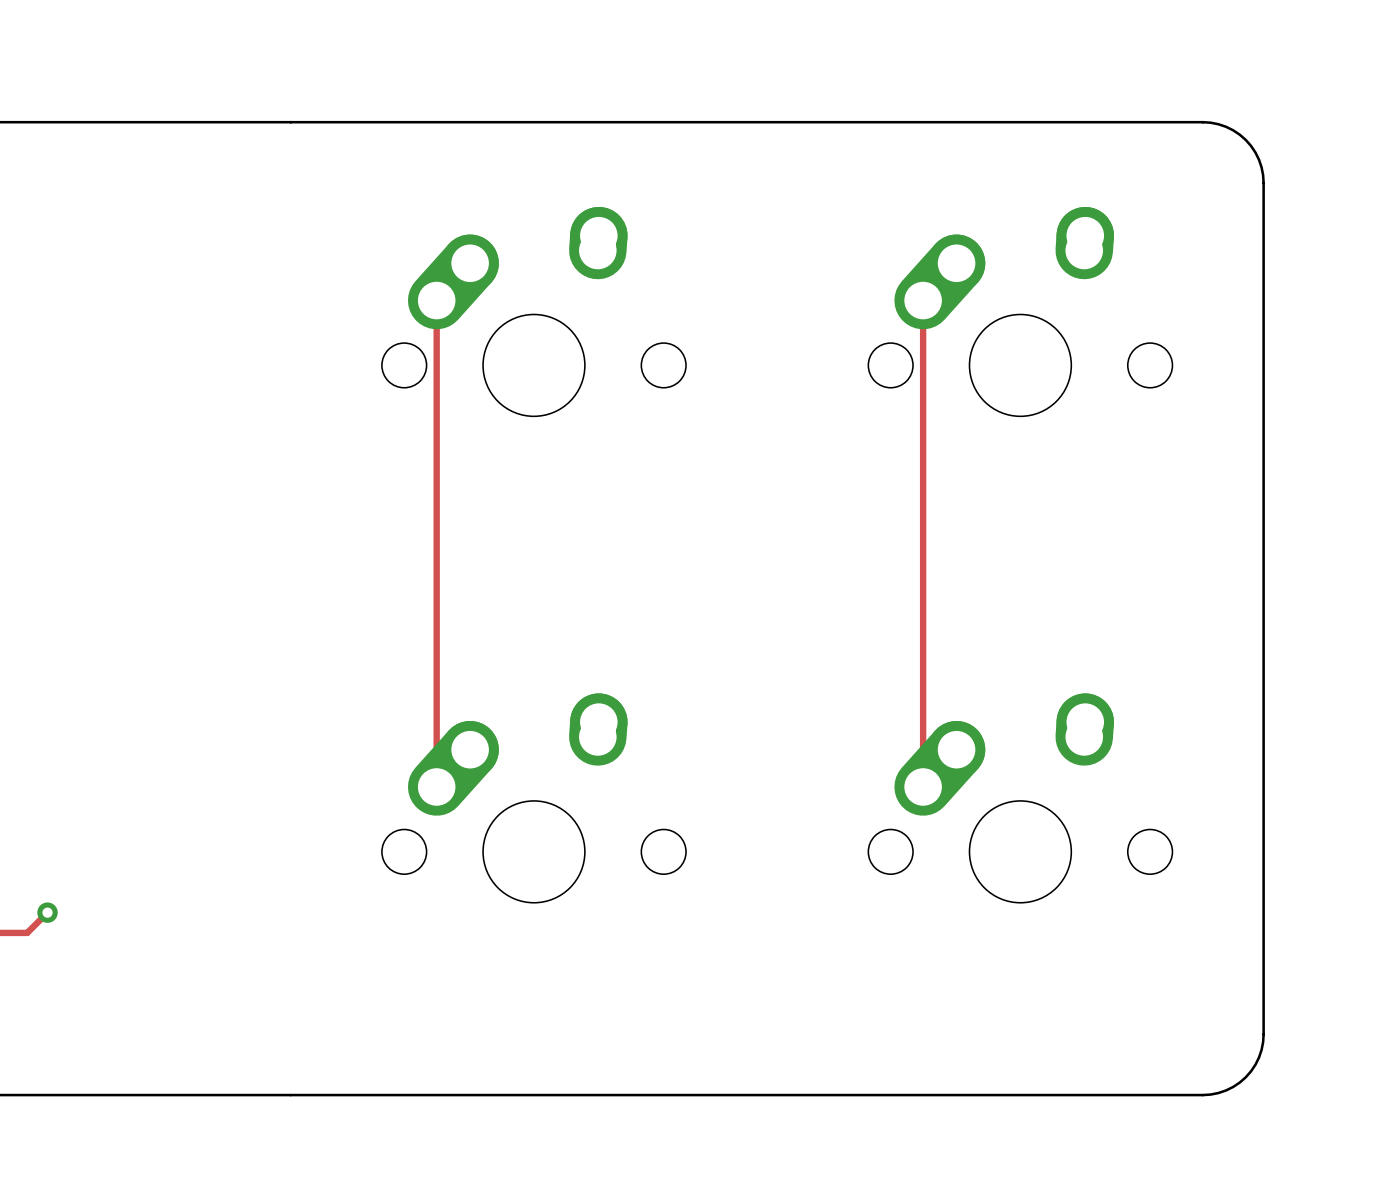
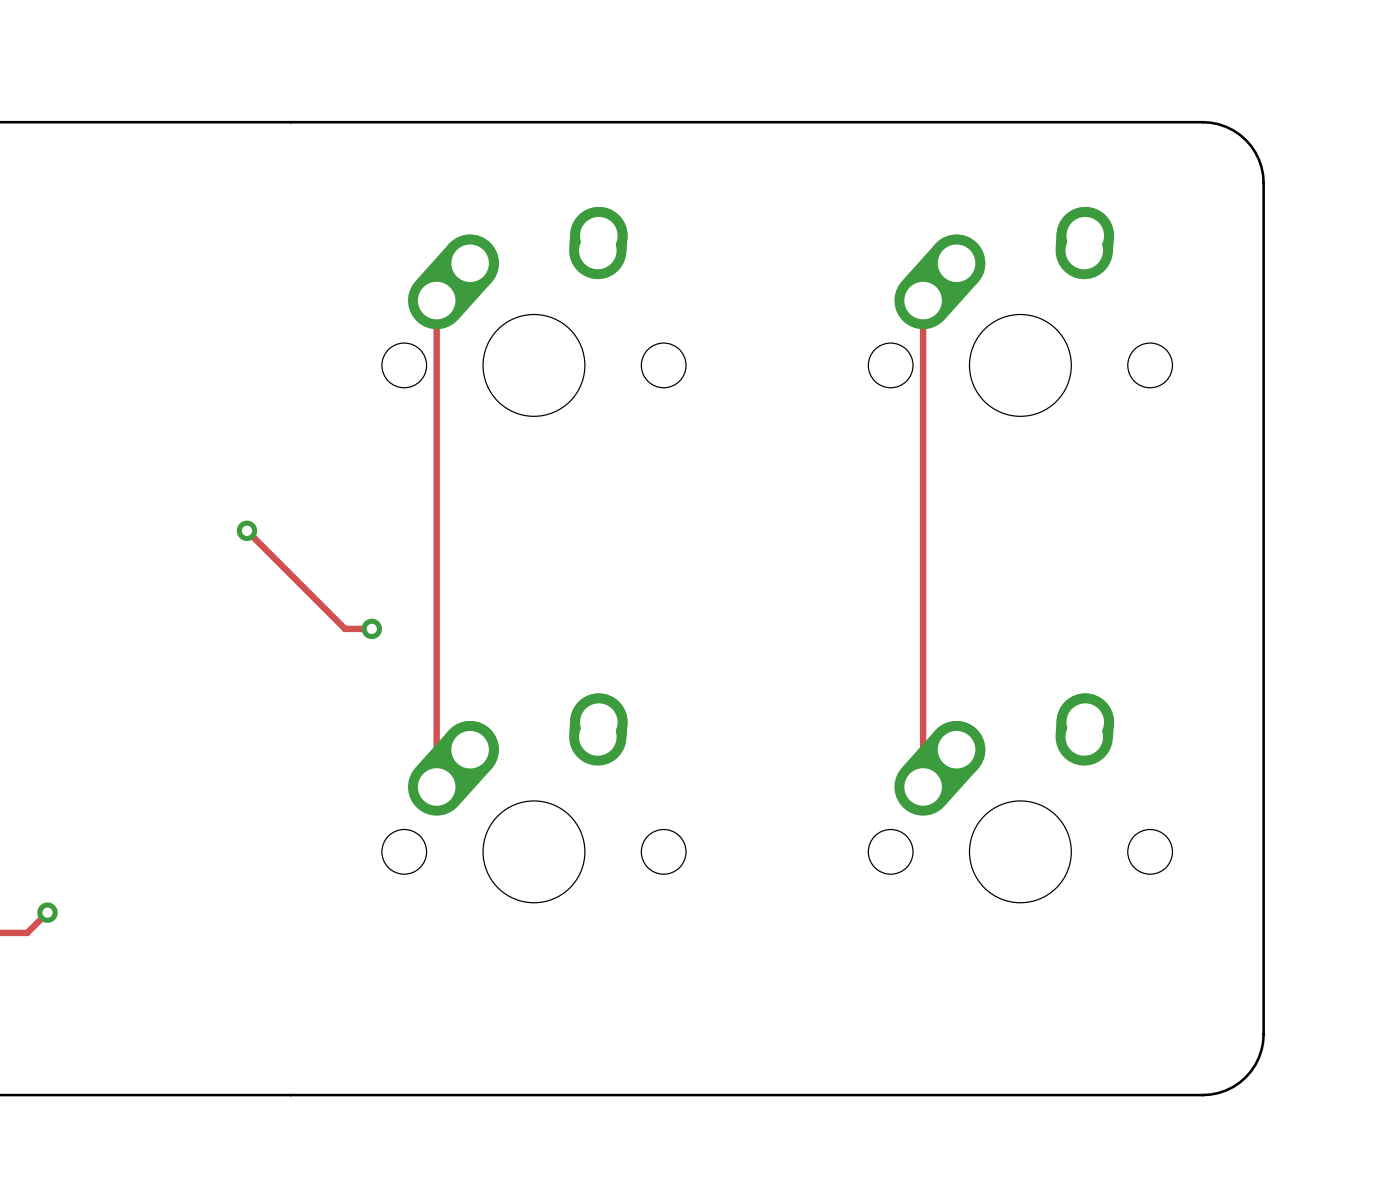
track: none -> (246, 530) (345, 628) (371, 628)
via: none -> (246, 530)
via: none -> (371, 628)

